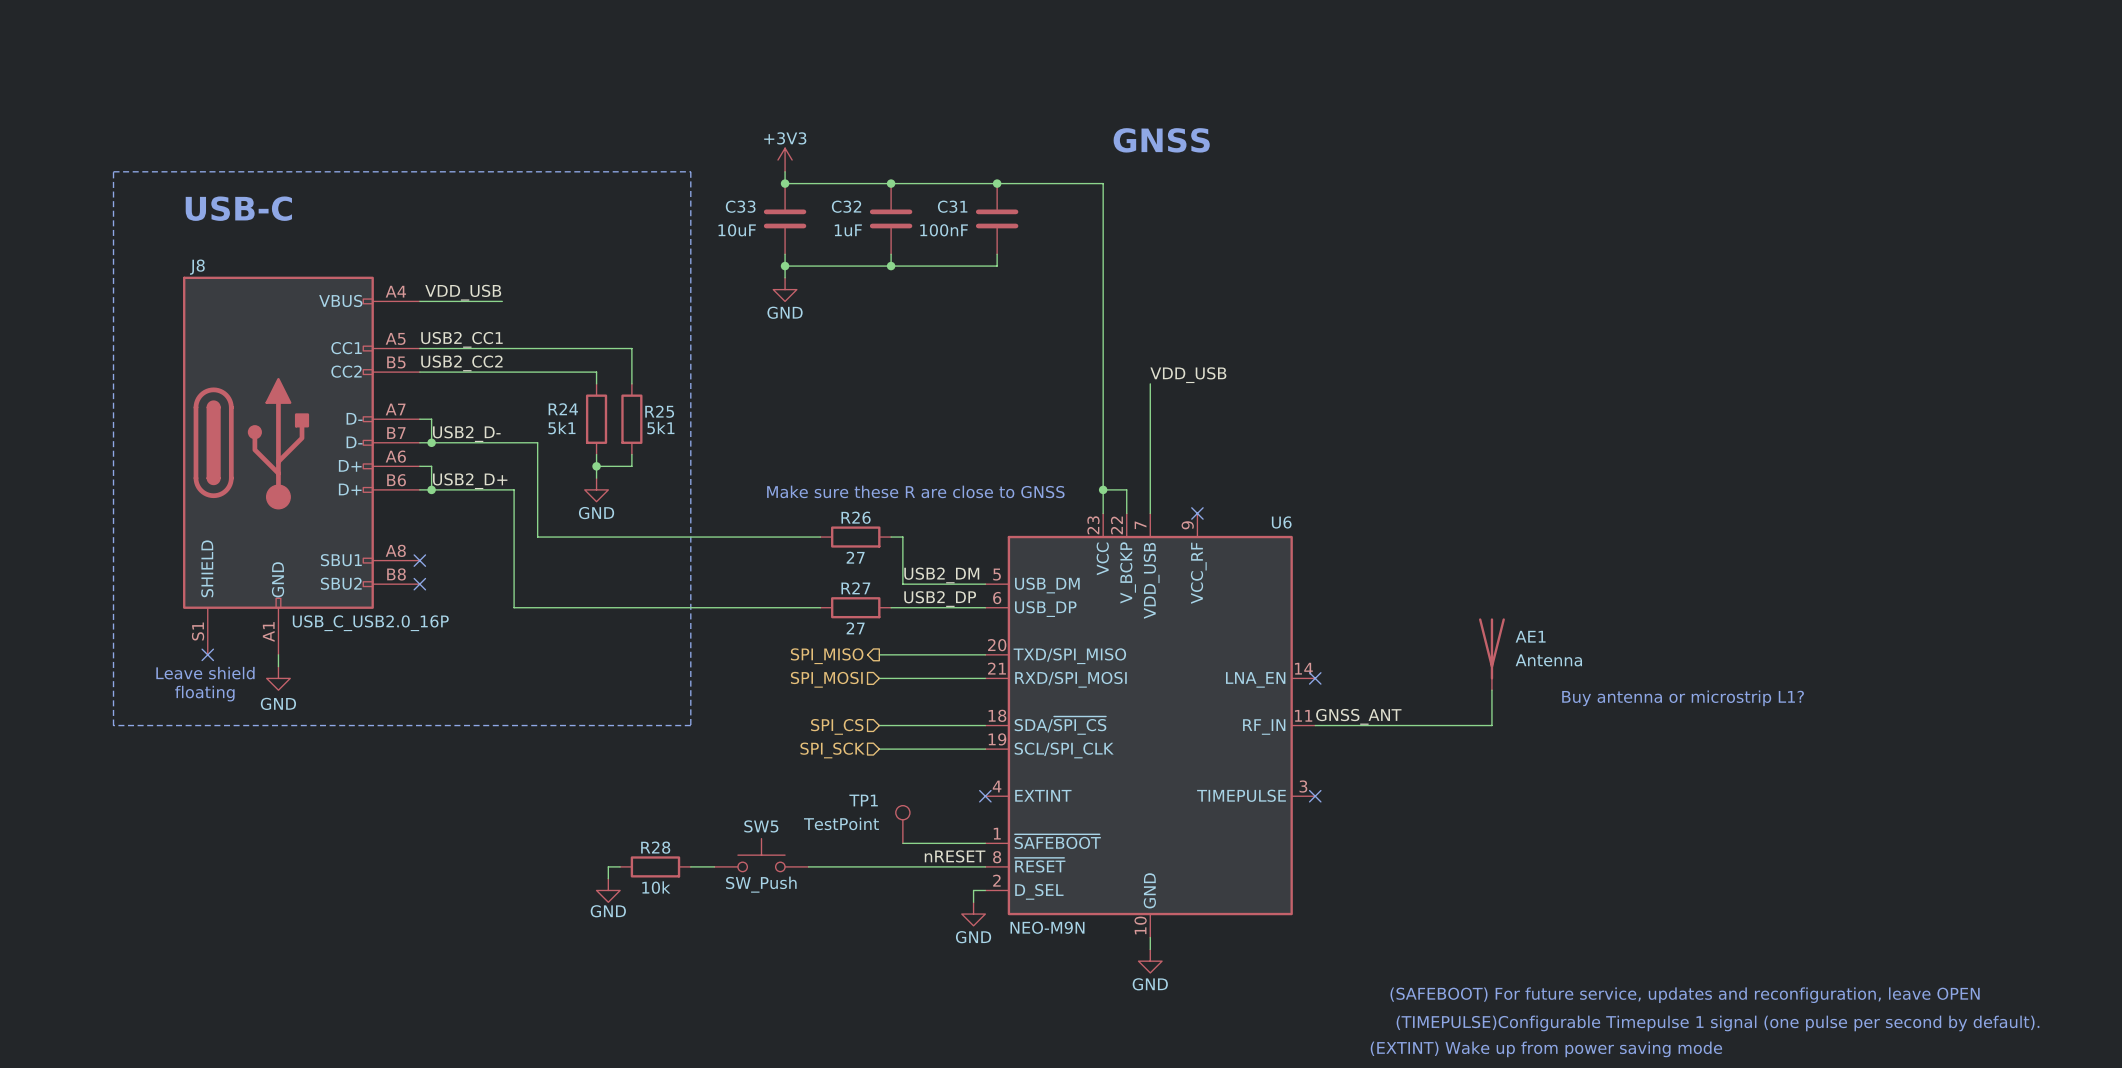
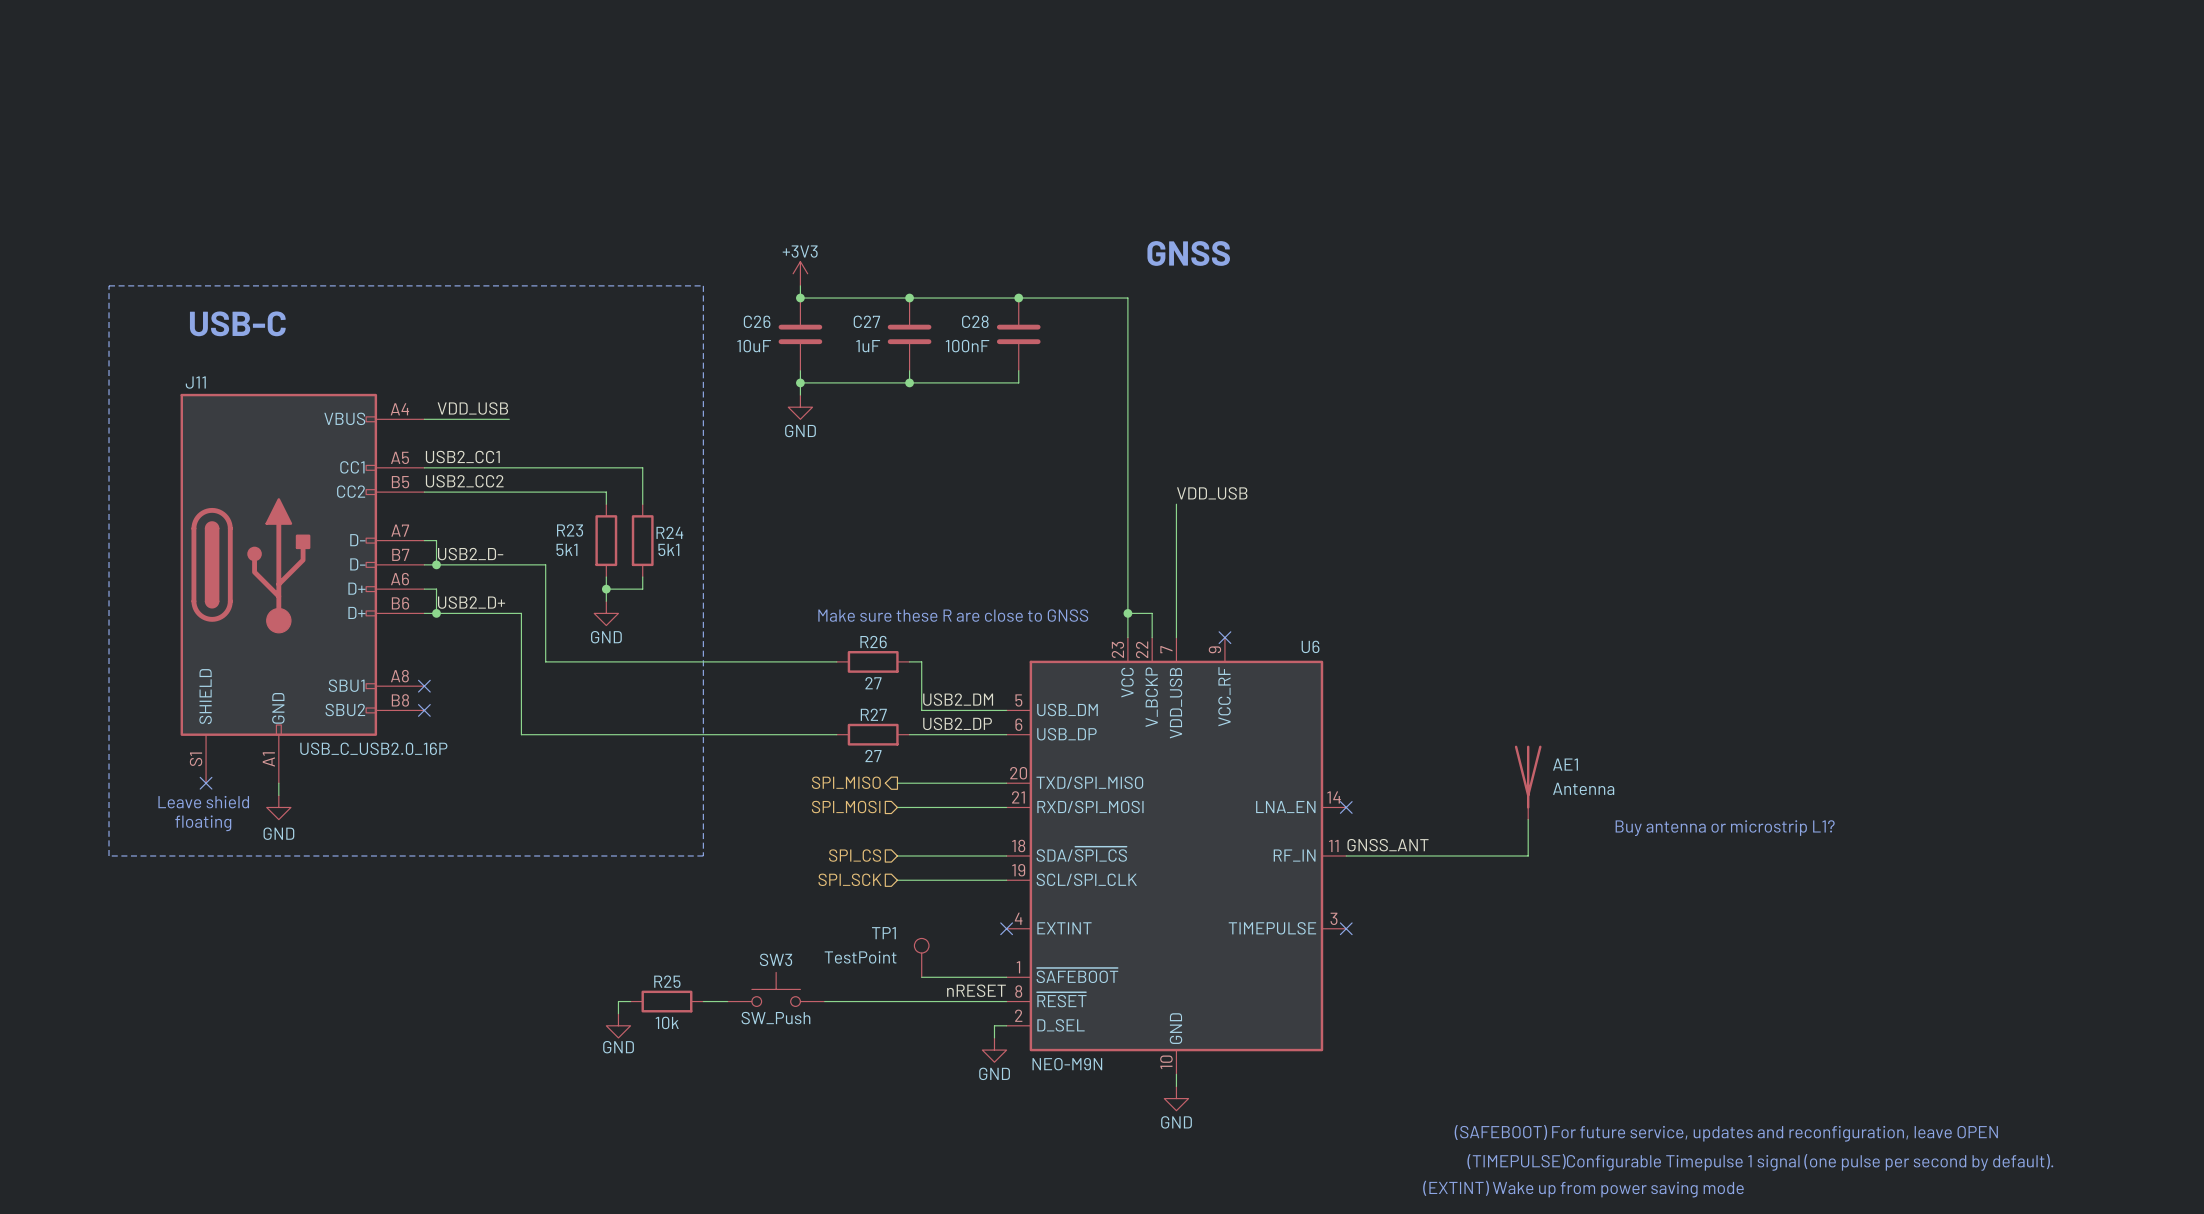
C33 name: C33 (740, 206) -> C26 (757, 321)
C32 name: C32 (846, 206) -> C27 (866, 321)
C31 name: C31 (952, 206) -> C28 (975, 321)
J8 name: J8 (197, 267) -> J11 (195, 382)
R24 name: R24 (563, 409) -> R23 (570, 530)
R25 name: R25 (659, 411) -> R24 (669, 532)
SW5 name: SW5 (761, 826) -> SW3 (776, 959)
R28 name: R28 (655, 847) -> R25 (667, 981)

